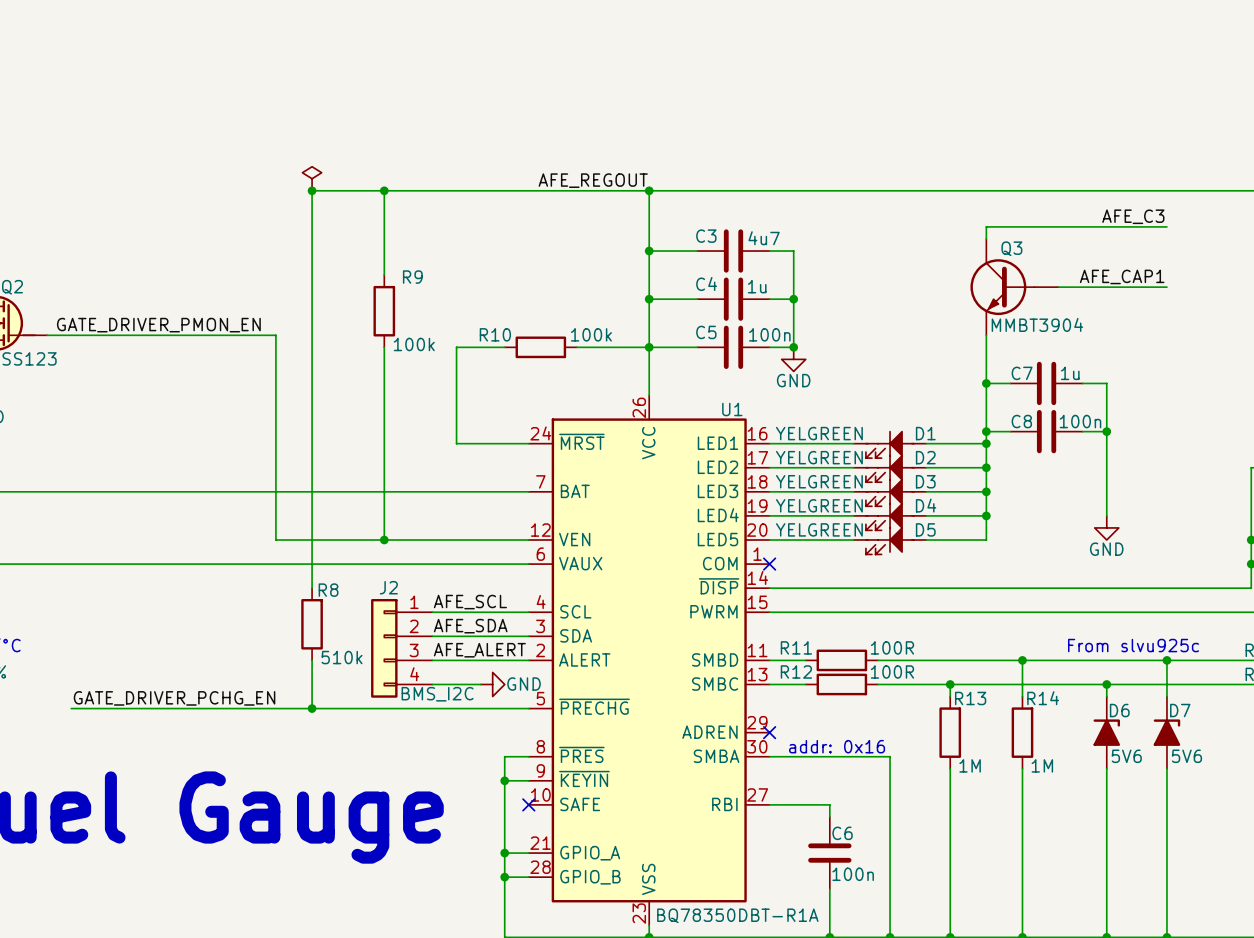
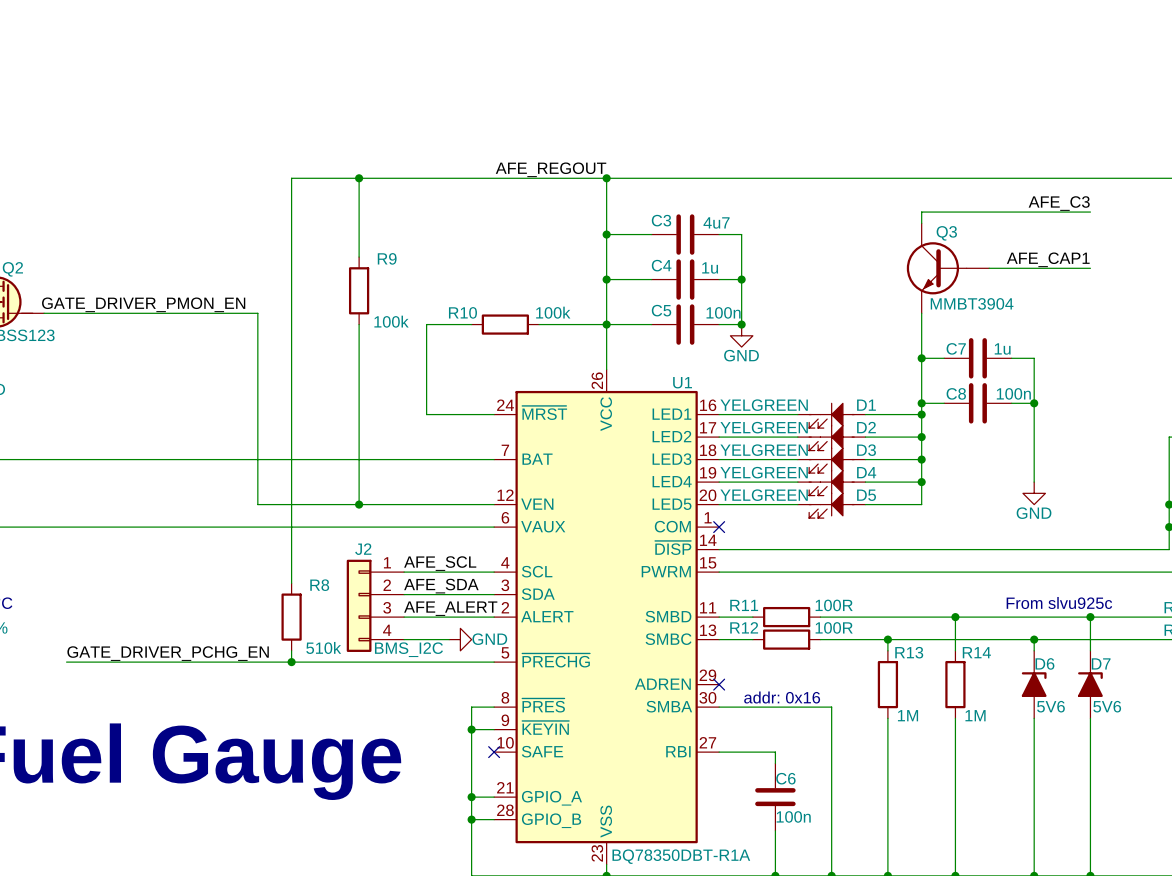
power symbol: (312, 178) -> none
junction: (312, 190) -> none
R8 name position: R8 (328, 590) -> R8 (319, 585)
R8 position: (312, 624) -> (291, 617)
wire: (312, 660) (312, 696) -> (291, 549) (291, 583)

